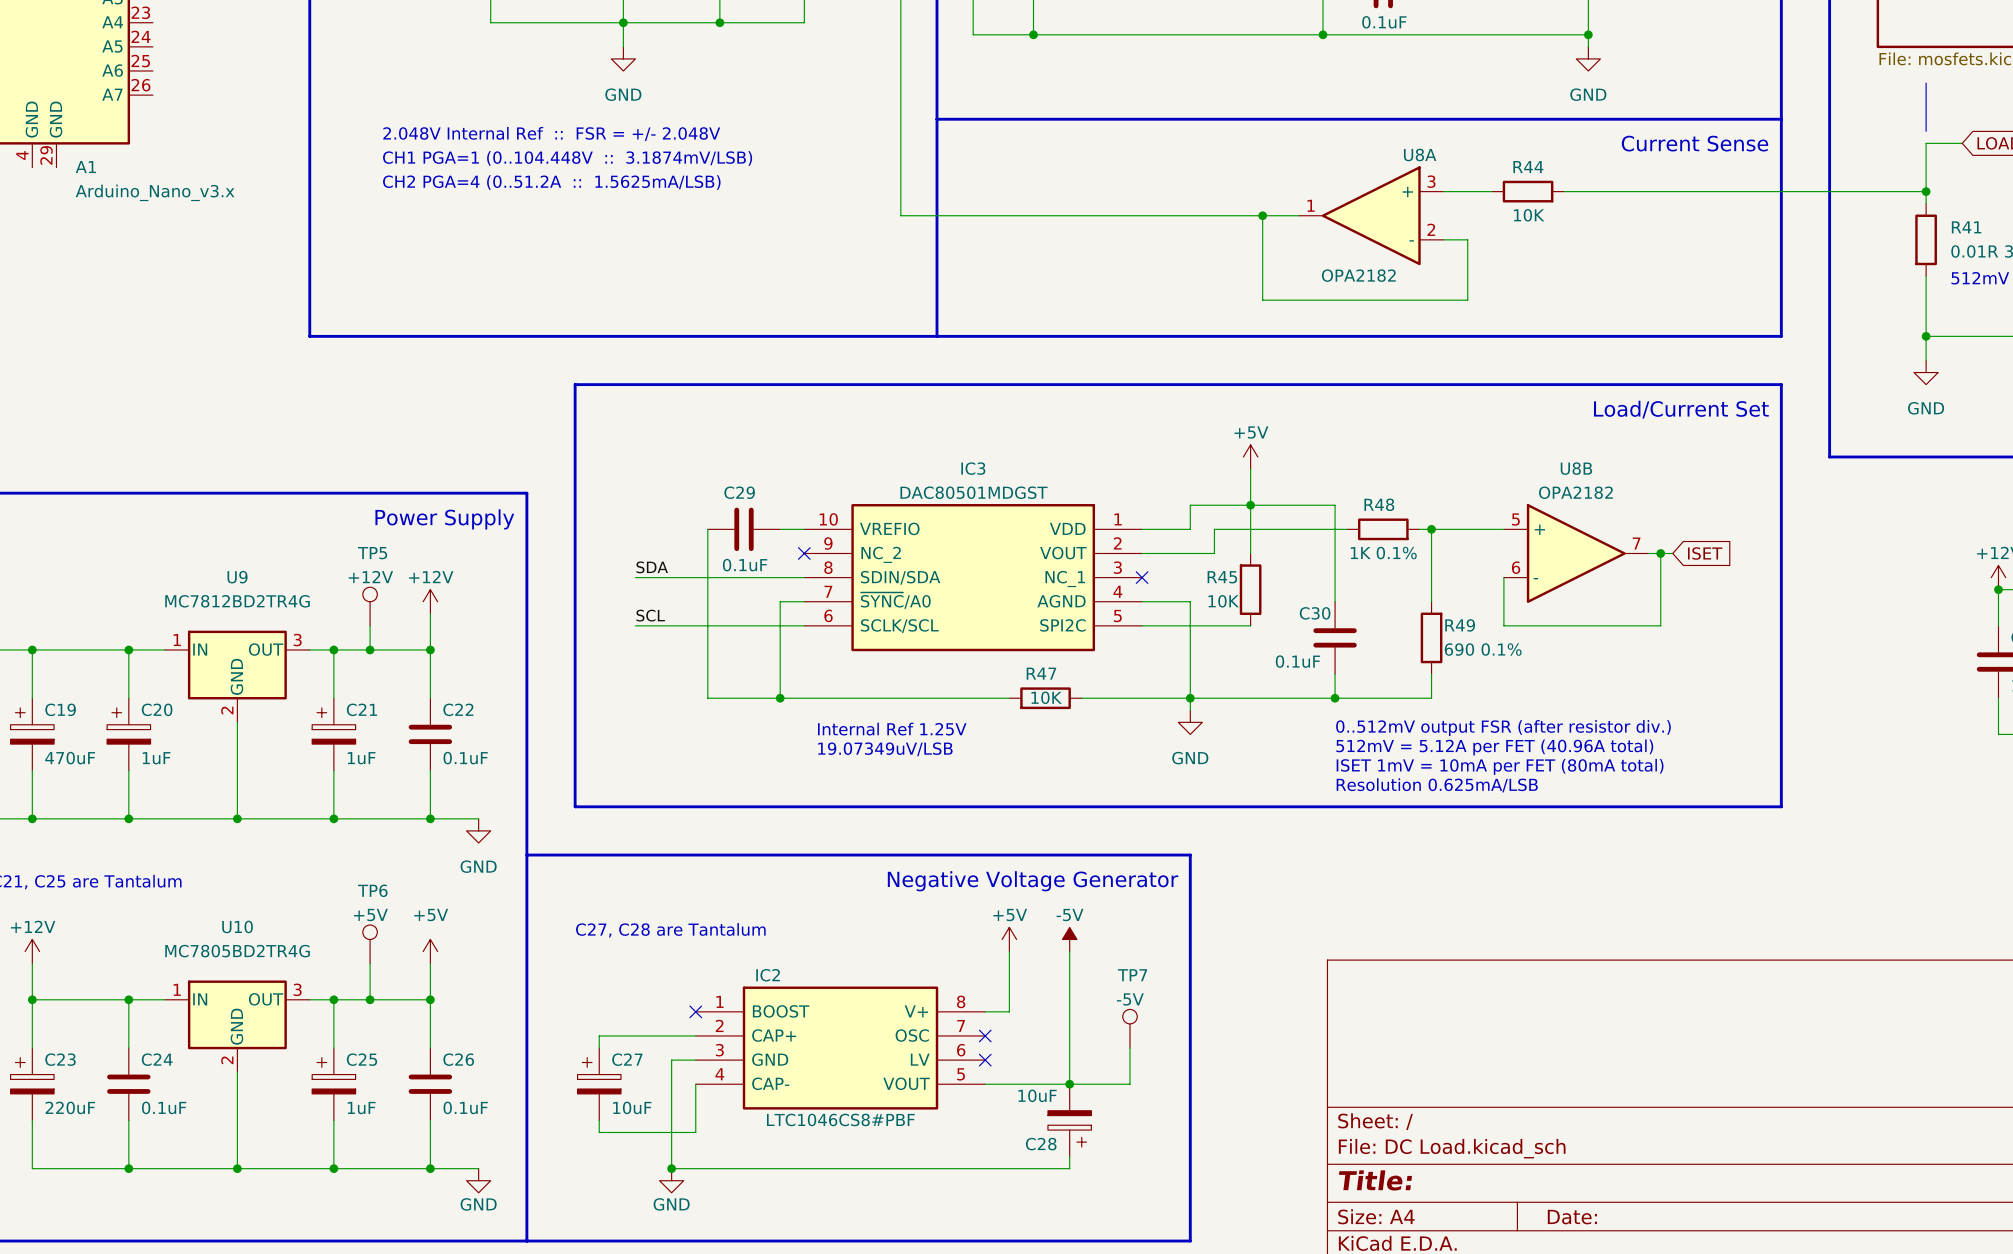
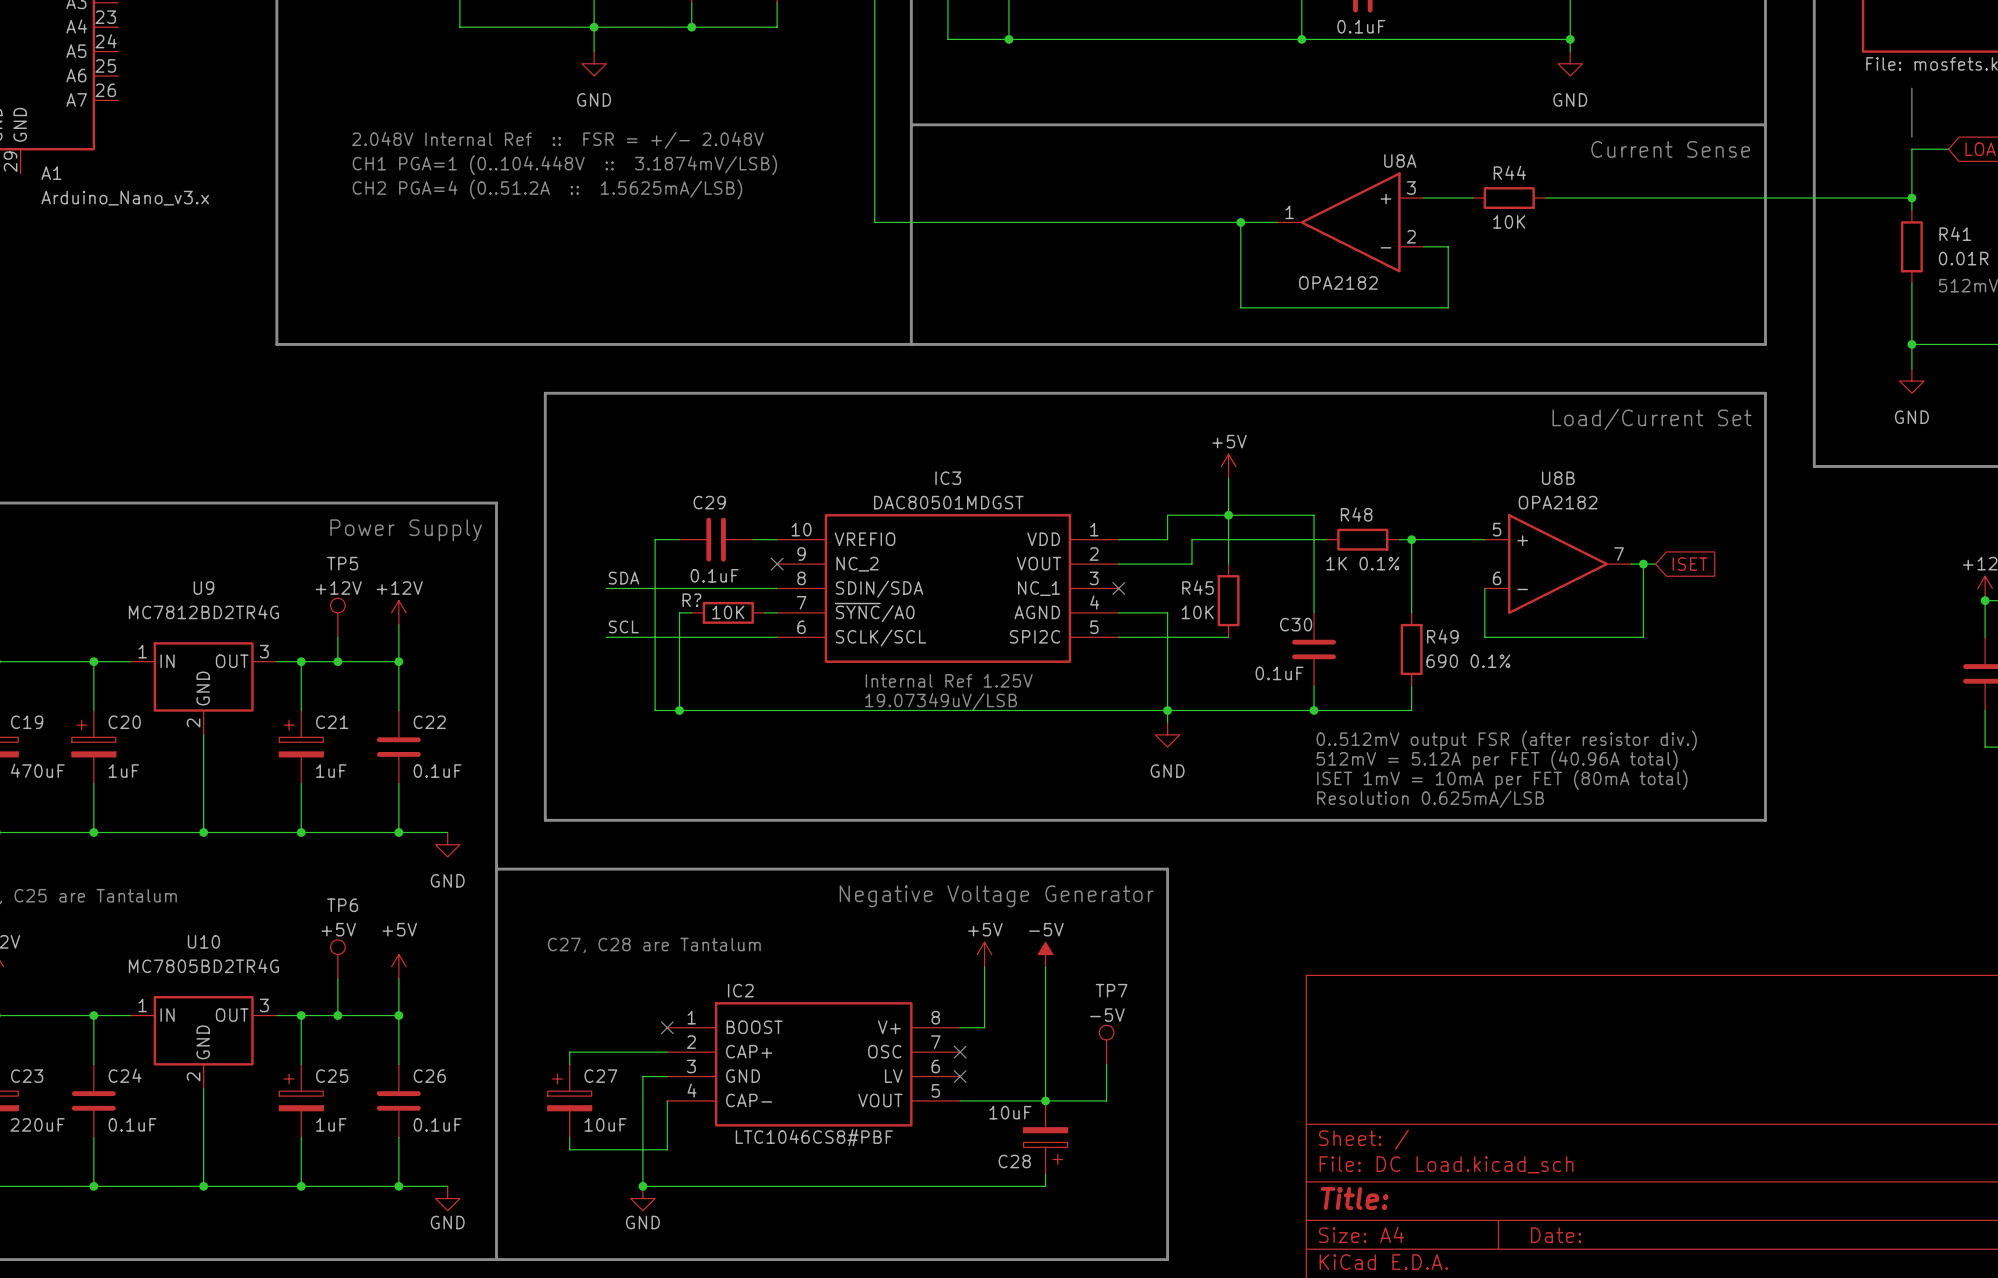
wire: (707, 529) (707, 601) -> (691, 612) (679, 612)
wire: none -> (679, 539) (655, 539) (655, 710) (679, 710)
R?: none -> 10K (728, 612)
wire: (792, 601) (780, 601) (780, 698) -> none
junction: none -> (679, 710)
junction: (780, 698) -> none
wire: none -> (984, 710) (1057, 710)
R47: 10K (1045, 698) -> none
text position: Internal Ref 1.25V (892, 729) -> Internal Ref 1.25V (949, 680)
text position: 19.07349uV/LSB (885, 749) -> 19.07349uV/LSB (941, 701)

